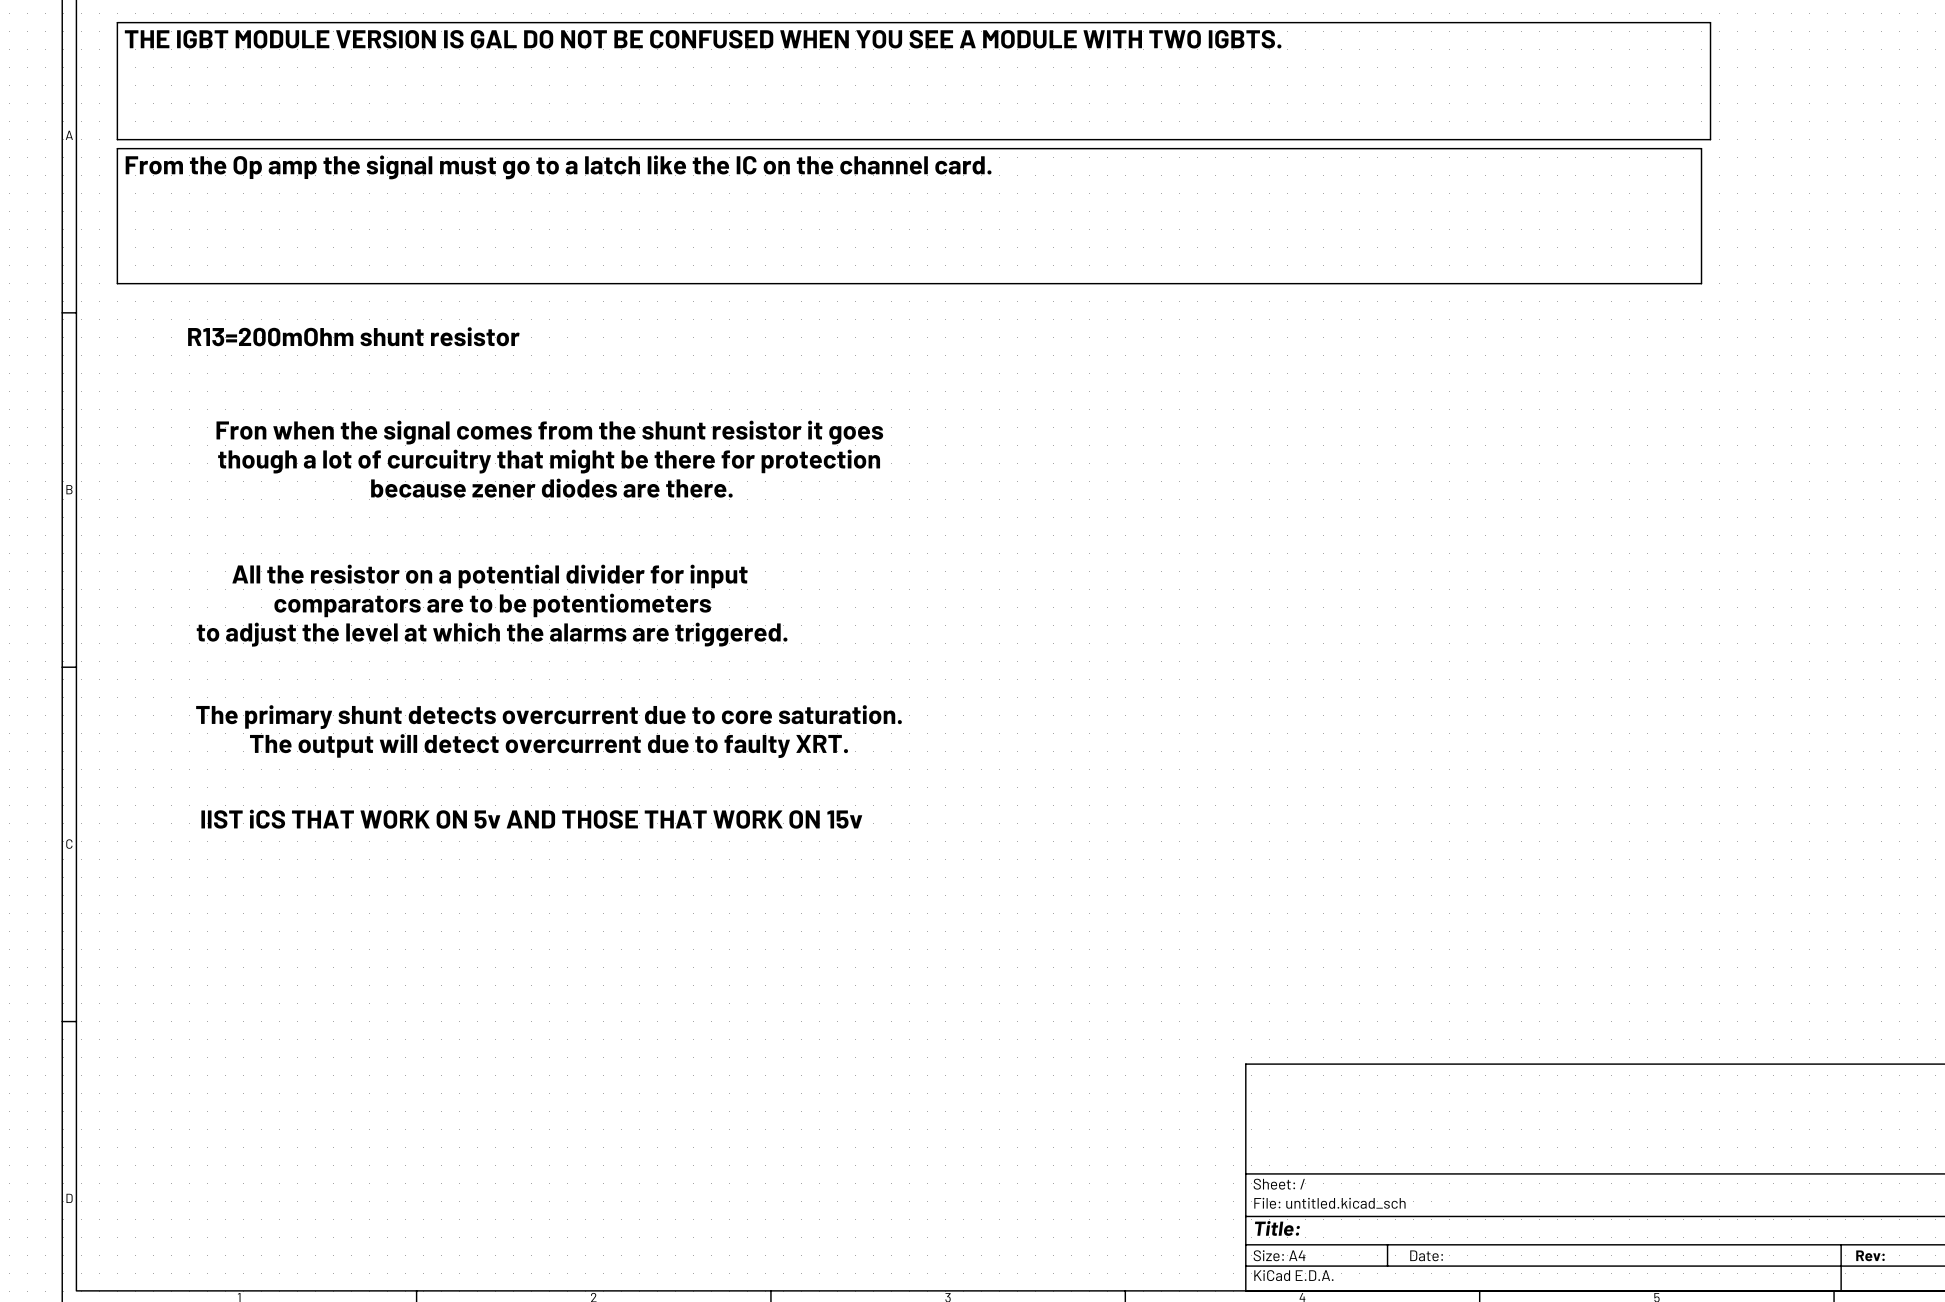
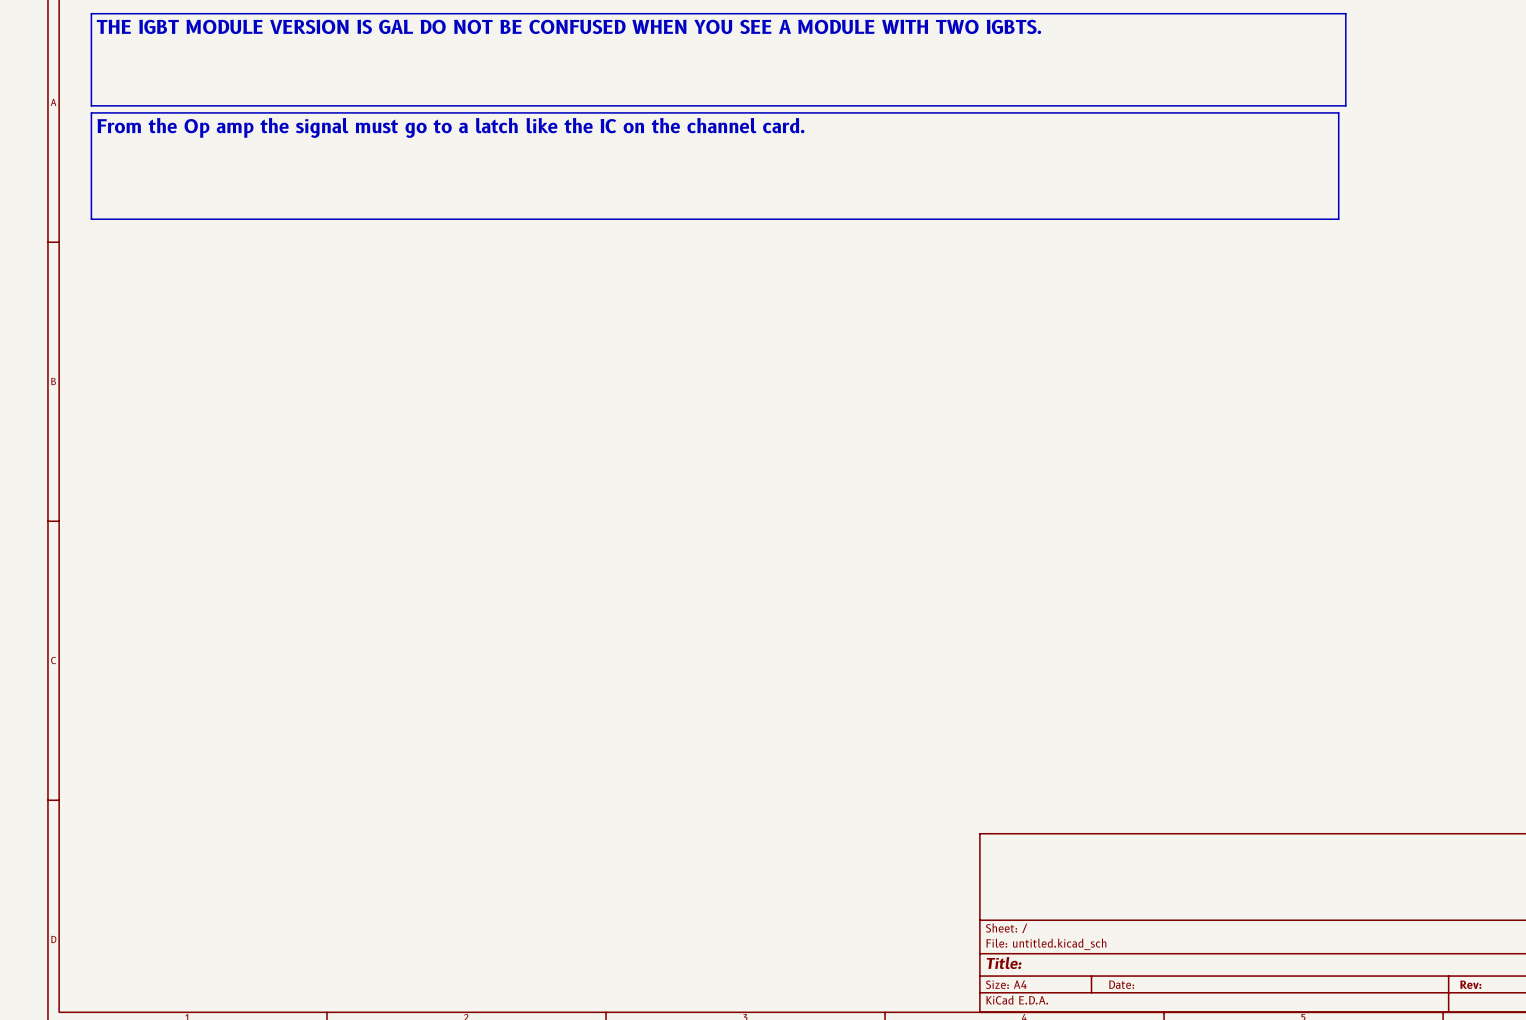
text: R13=200mOhm shunt resistor (353, 336) -> none
text: Fron when the signal comes from the shunt resistor it goes (549, 432) -> none
text: though a lot of curcuitry that might be there for protection (549, 461) -> none
text: because zener diodes are there. (551, 488) -> none
text: All the resistor on a potential divider for input (489, 576) -> none
text: comparators are to be potentiometers (492, 605) -> none
text: to adjust the level at which the alarms are triggered. (492, 634) -> none
text: The primary shunt detects overcurrent due to core saturation. (548, 717) -> none
text: The output will detect overcurrent due to faulty XRT. (548, 746) -> none
text: lIST iCS THAT WORK ON 5v AND THOSE THAT WORK ON 15v (531, 819) -> none

